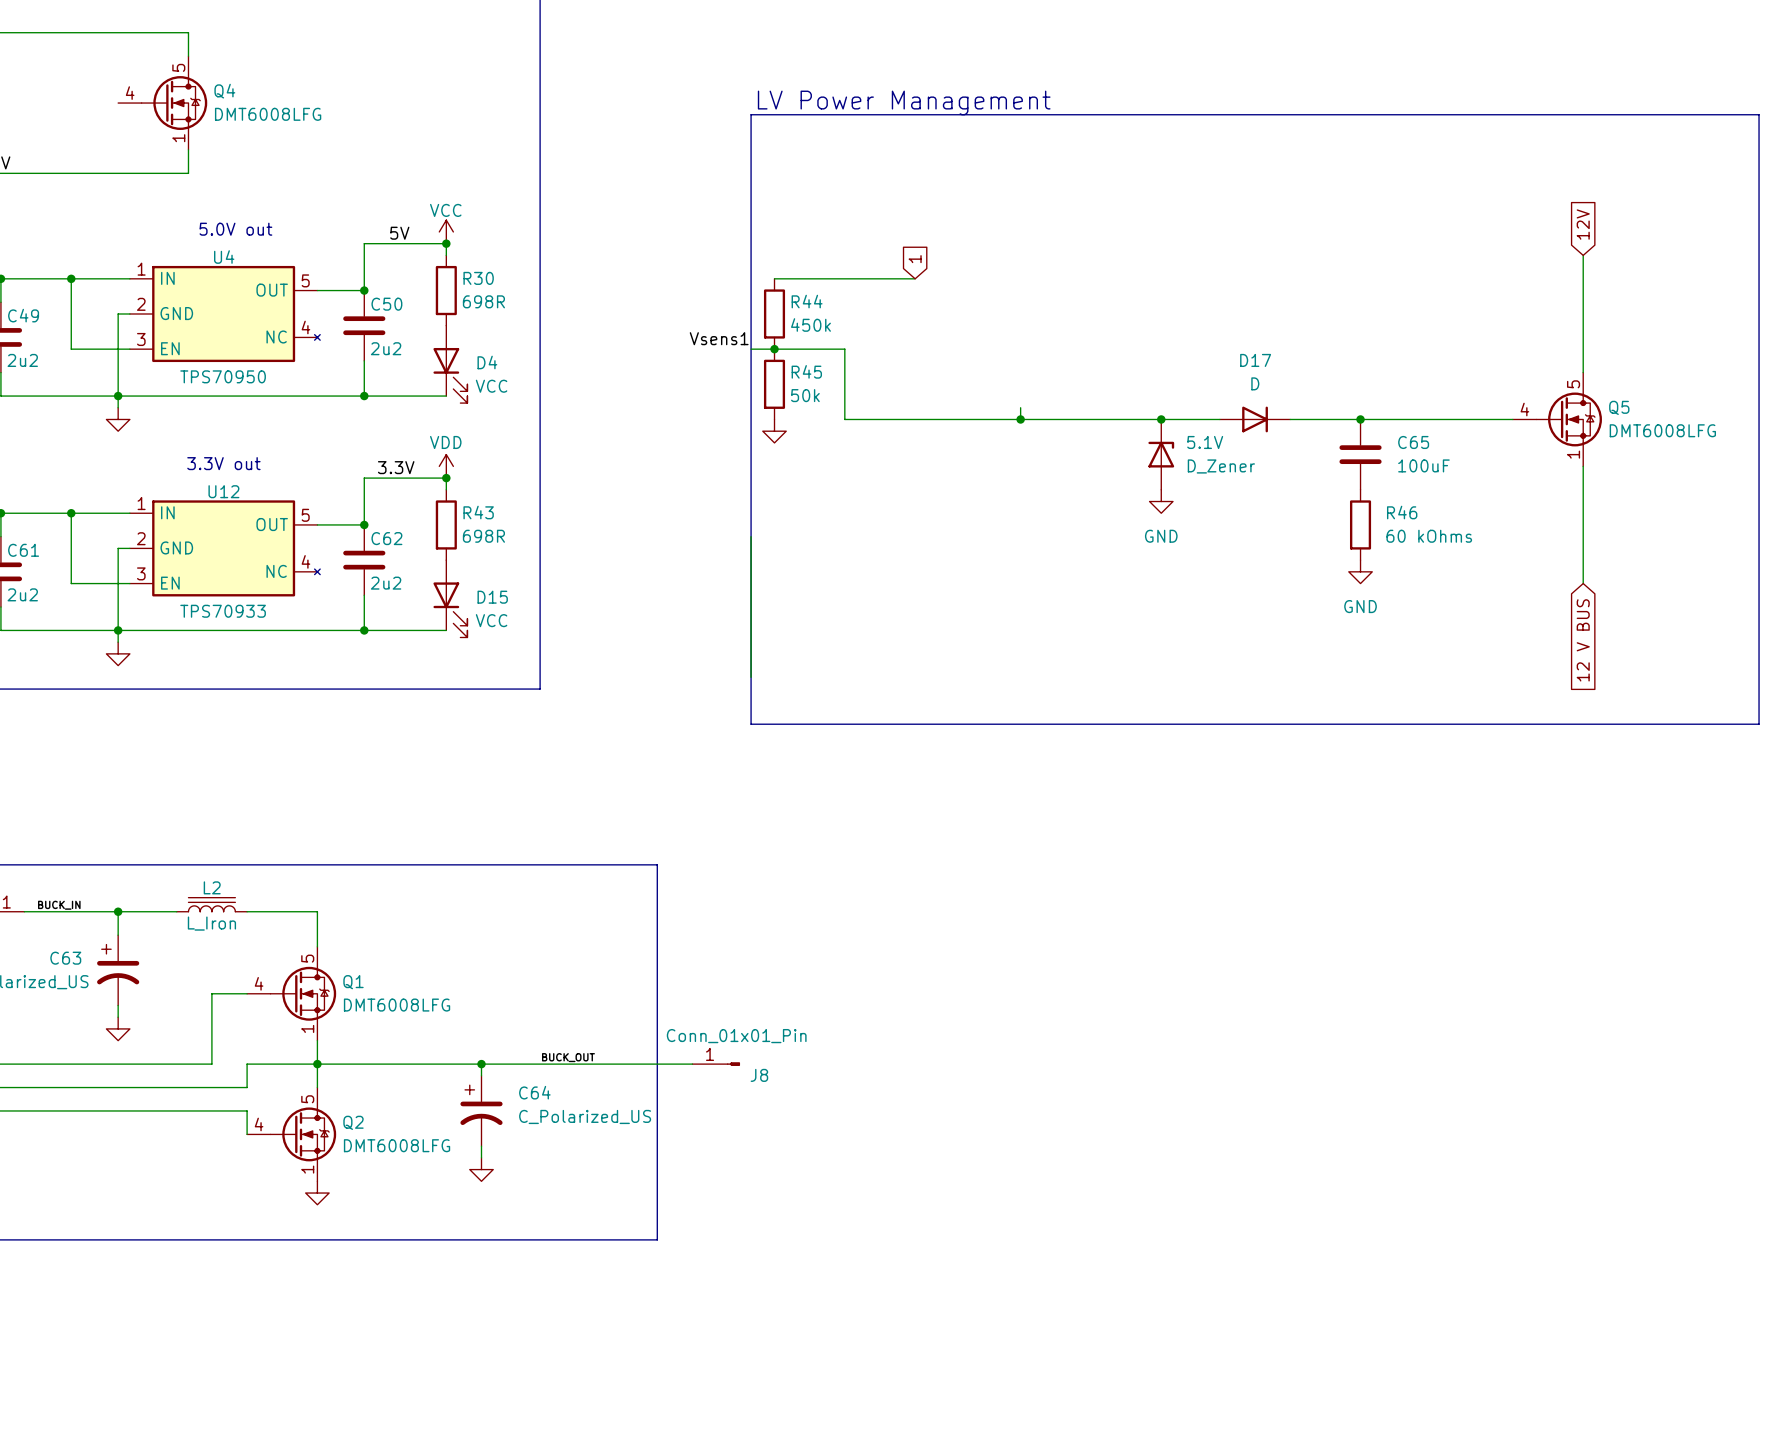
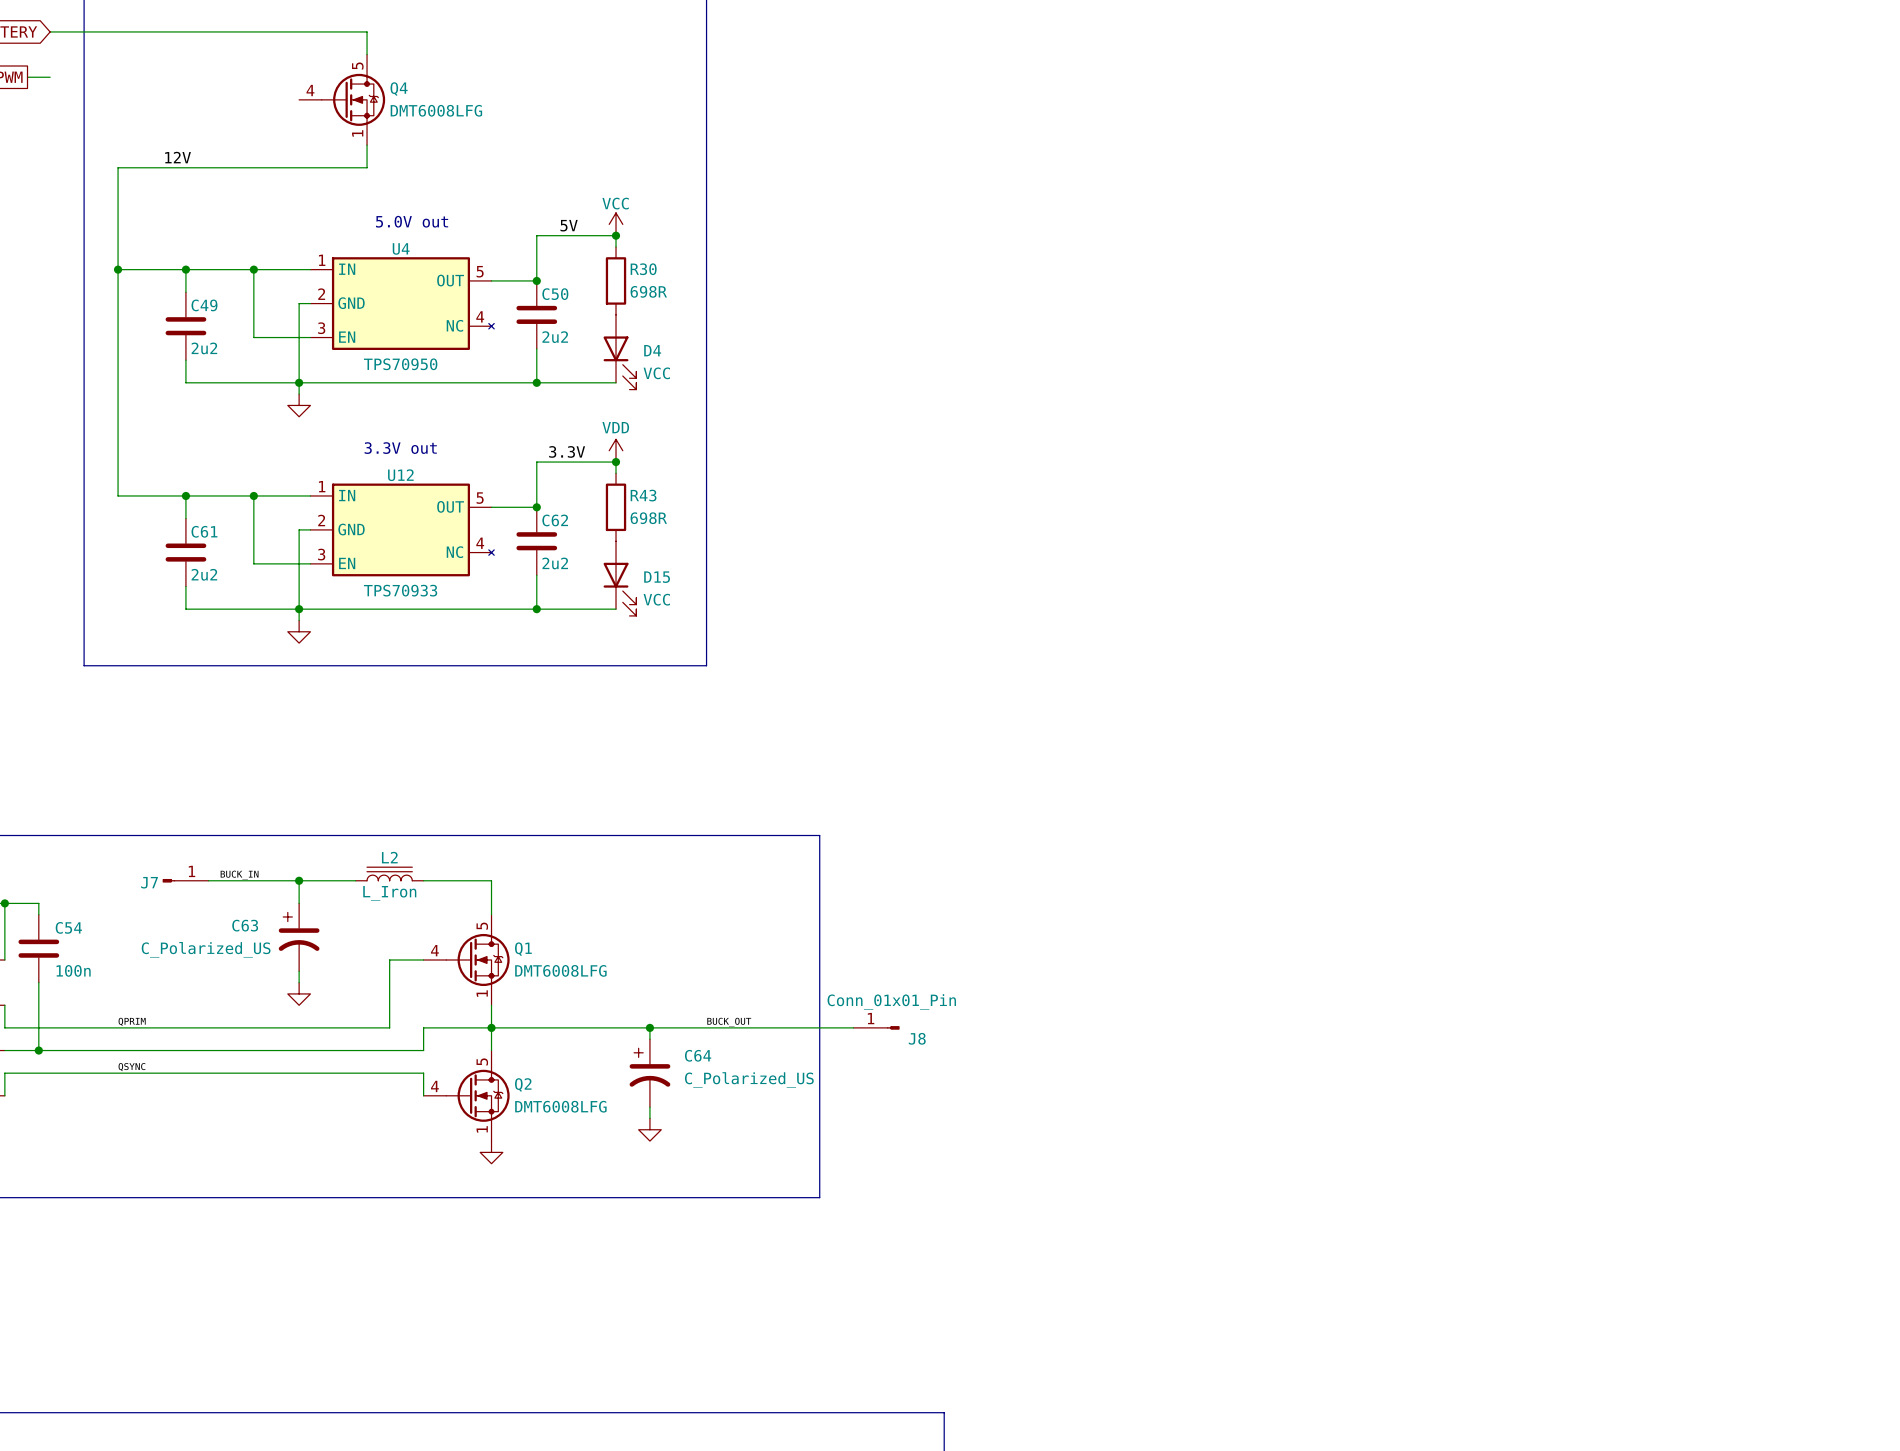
text: LV Power Management (904, 102) -> none
line: (751, 114) (1759, 114) (1759, 724) (751, 724) (751, 114) -> none
global label: 12V (1583, 224) -> none
wire: (1583, 255) (1583, 372) -> none
global label: 1 (915, 259) -> none
wire: (774, 278) (915, 278) -> none
R44: 450k (774, 313) -> none
label: Vsens1 (719, 338) -> none
wire: (751, 349) (844, 349) (844, 419) (1219, 419) -> none
junction: (774, 349) -> none
R45: 50k (774, 384) -> none
wire: (1020, 407) (1020, 419) -> none
junction: (1020, 419) -> none
junction: (1161, 419) -> none
D17: D (1255, 419) -> none
wire: (1290, 419) (1512, 419) -> none
junction: (1360, 419) -> none
Q5: DMT6008LFG (1557, 419) -> none
power symbol: (774, 431) -> none
5.1V: D_Zener (1161, 454) -> none
C65: 100uF (1360, 454) -> none
wire: (1583, 466) (1583, 583) -> none
power symbol: GND (1161, 501) -> none
R46: 60 kOhms (1360, 524) -> none
wire: (751, 536) (751, 677) -> none
power symbol: GND (1360, 571) -> none
global label: 12 V BUS (1583, 640) -> none

